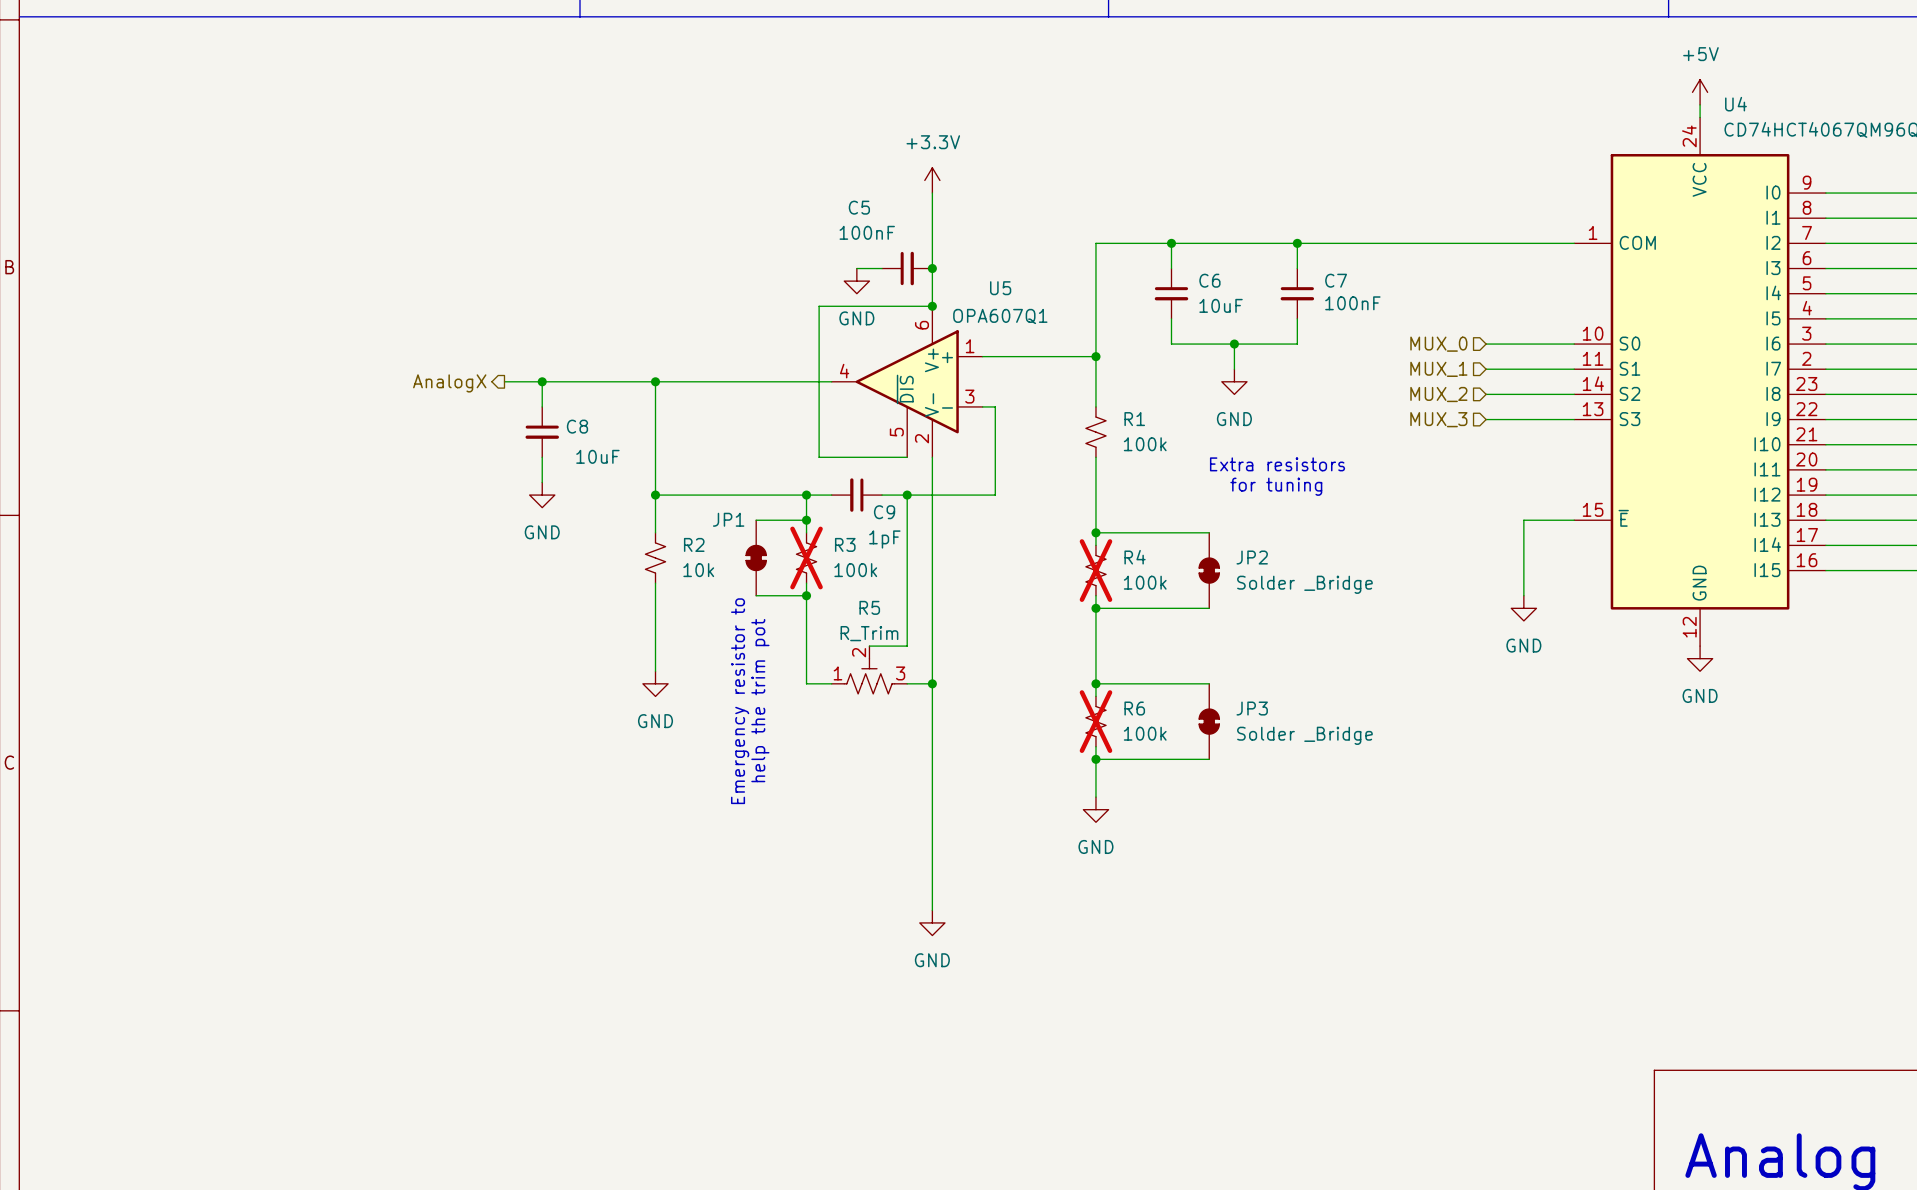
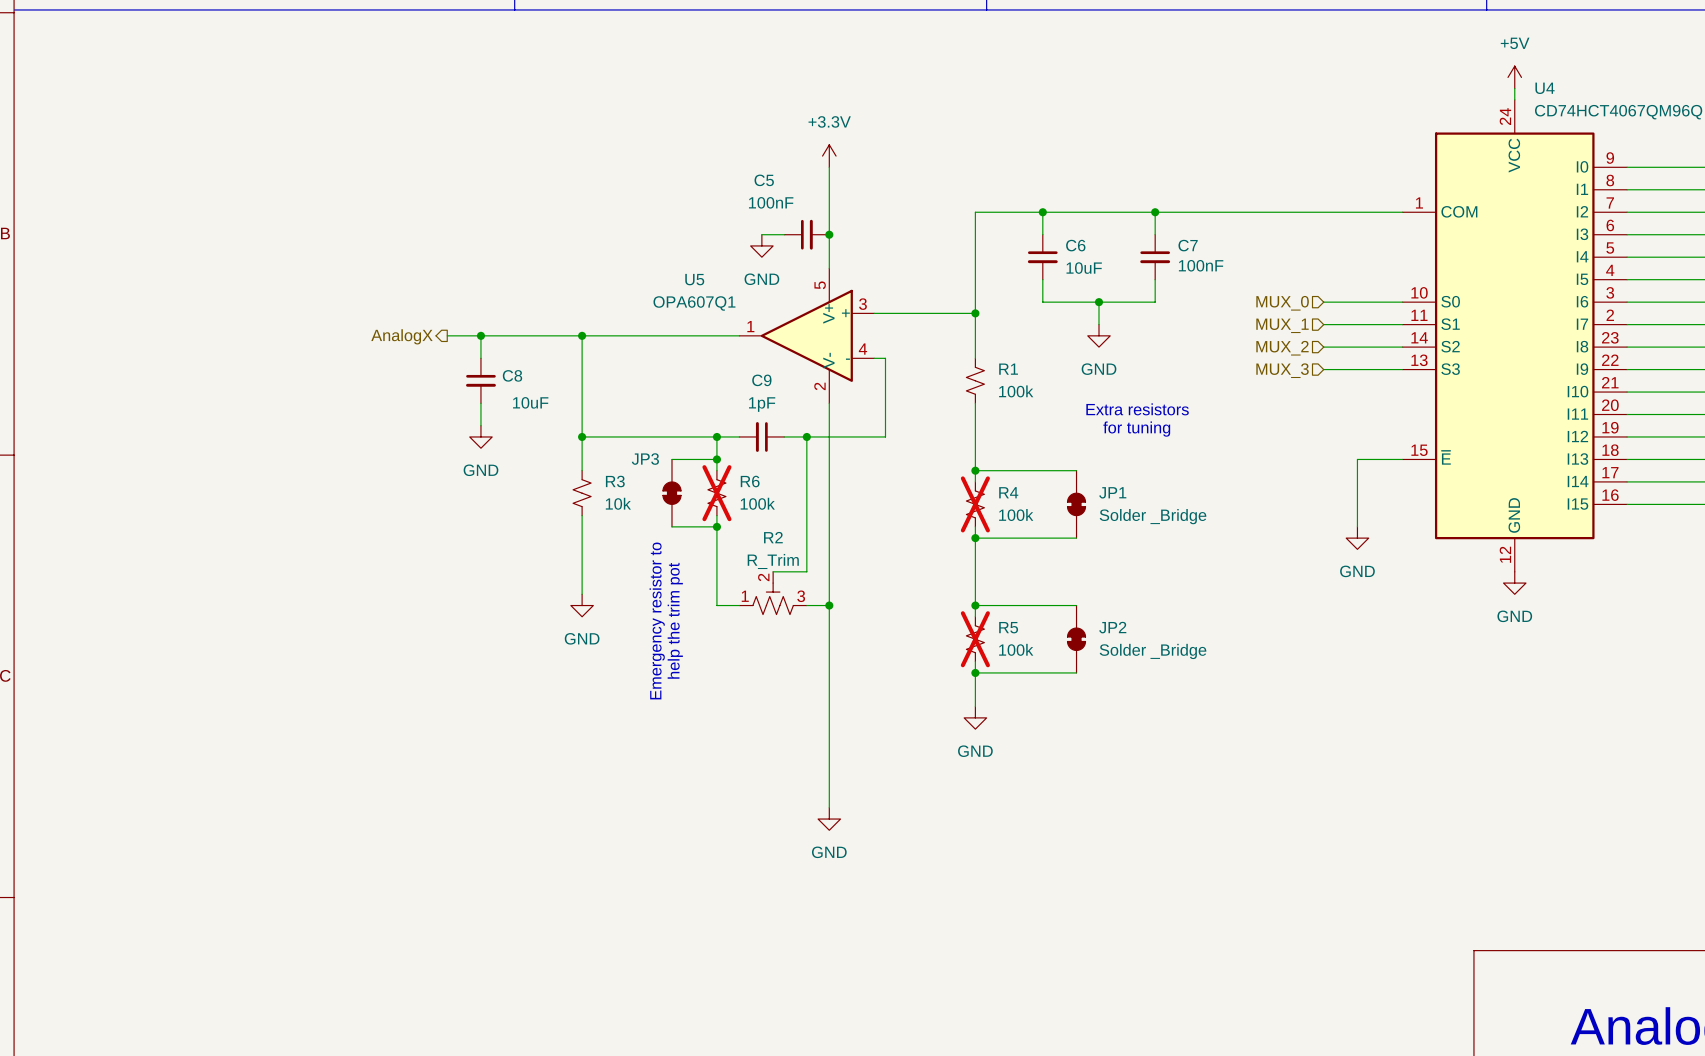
U5 name position: U5 (1000, 288) -> U5 (694, 279)
U5 symbol: [831, 306, 983, 458] -> [739, 268, 875, 404]
wire: (932, 306) (819, 306) (819, 457) (907, 457) -> none
junction: (932, 306) -> none
U5 value position: OPA607Q1 (1000, 316) -> OPA607Q1 (694, 303)
C9 name position: C9 (884, 512) -> C9 (761, 380)
JP1 name: JP1 (728, 519) -> JP3 (645, 459)
C9 value position: 1pF (884, 539) -> 1pF (762, 404)
R2 name: R2 (694, 544) -> R3 (615, 481)
R3 name: R3 (845, 544) -> R6 (750, 481)
JP2 name: JP2 (1252, 557) -> JP1 (1112, 492)
R5 name: R5 (869, 607) -> R2 (773, 537)
R6 name: R6 (1134, 708) -> R5 (1008, 627)
JP3 name: JP3 (1252, 708) -> JP2 (1112, 627)

